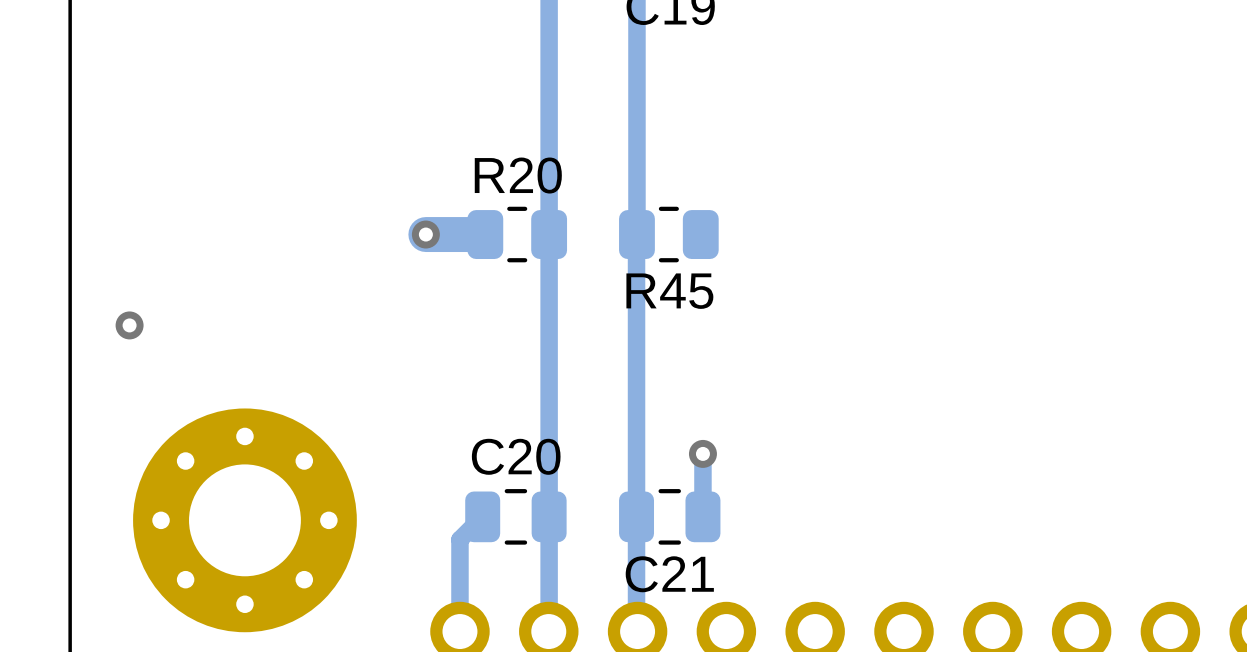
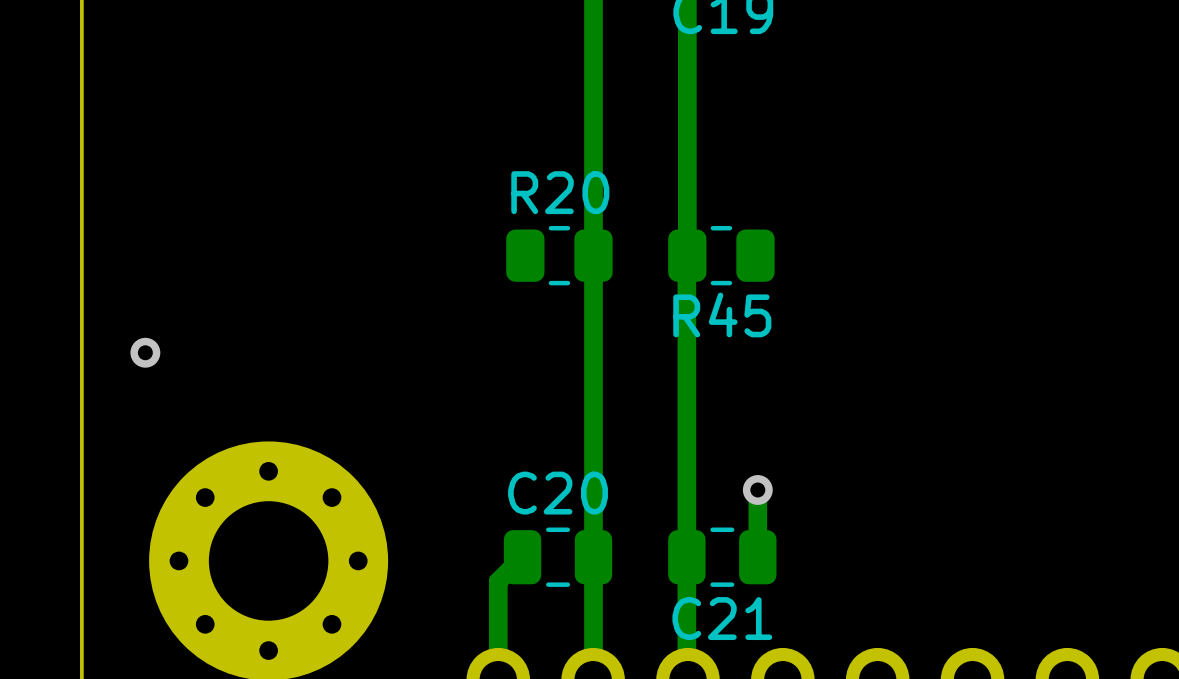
via: (425, 234) -> none
track: (485, 234) (425, 234) -> none

